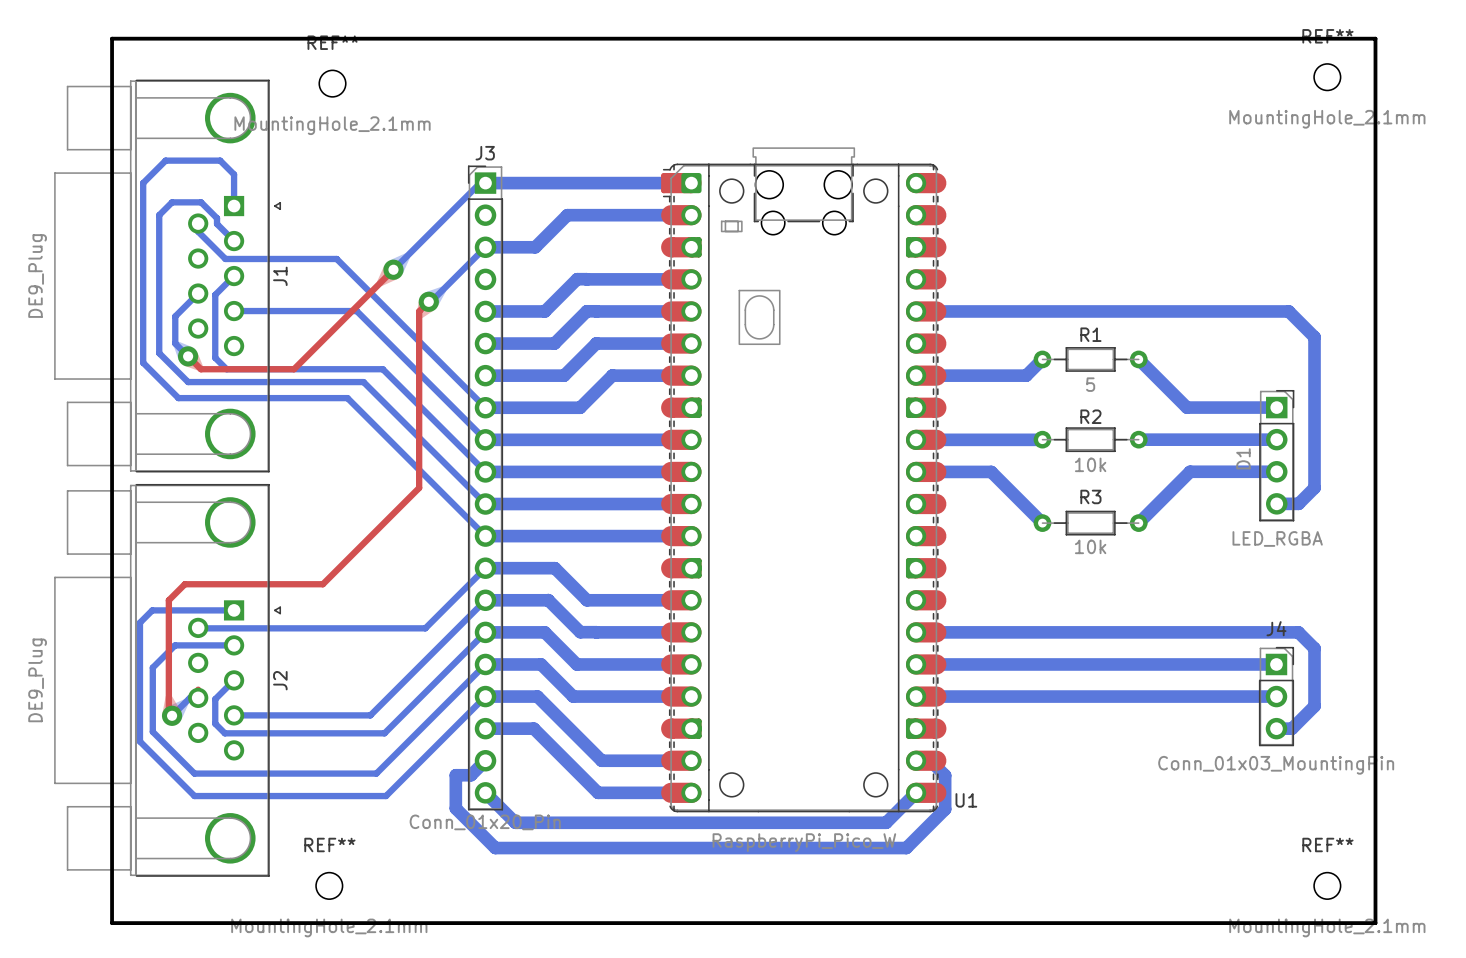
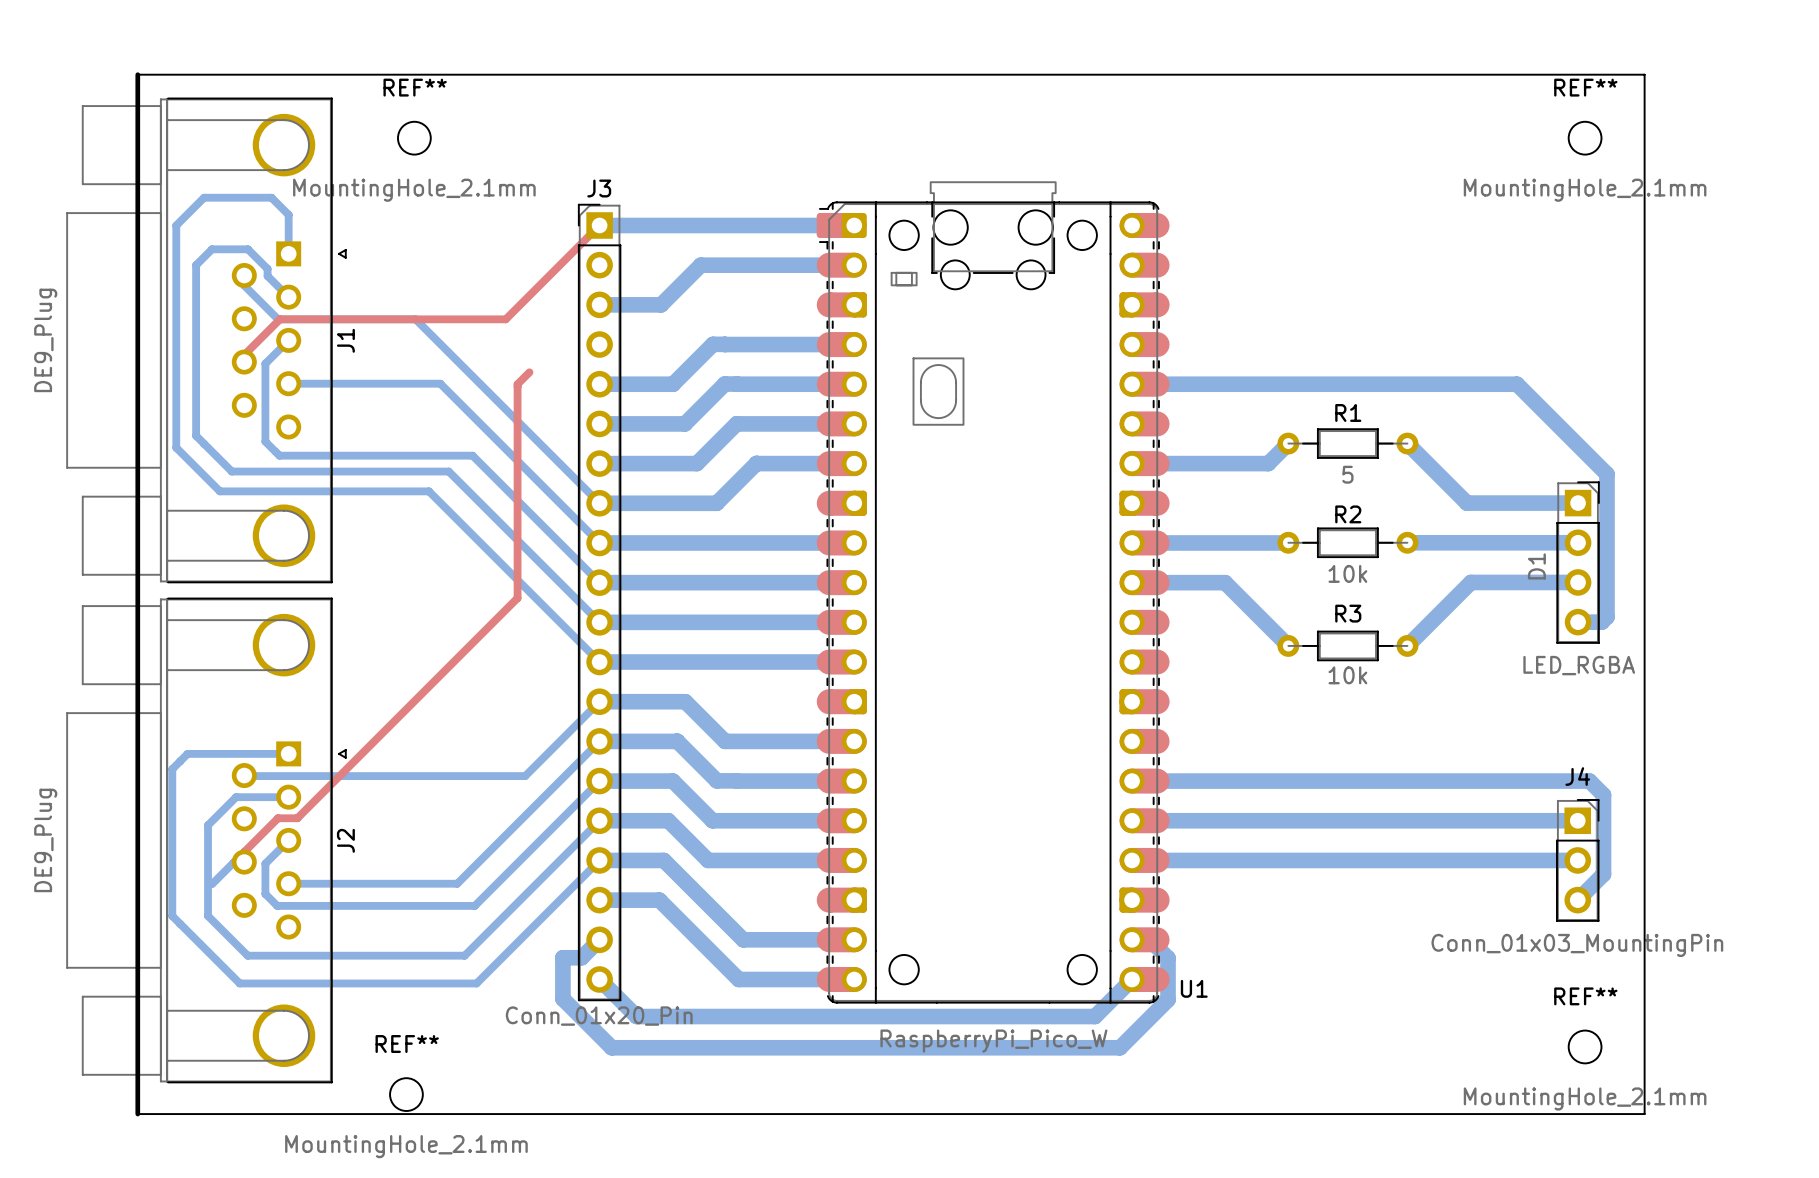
board edge: (112, 61) (112, 38) (1375, 38) (1375, 923) (112, 923) (112, 901) -> (137, 74) (1644, 74) (1644, 1114) (137, 1114)
REF** position: (1327, 77) -> (1585, 138)
REF** position: (332, 83) -> (414, 138)
bottom track: (485, 183) (480, 183) (393, 269) -> none
top track: none -> (599, 225) (505, 319) (279, 319) (244, 354)
bottom track: (483, 247) (485, 247) (430, 301) (428, 301) -> none
top track: (393, 269) (294, 369) (200, 369) (188, 356) -> none
via: (393, 269) -> none
bottom track: (198, 293) (175, 316) (175, 343) (188, 356) -> none
via: (428, 301) -> none
bottom track: (1227, 311) (1288, 311) (1314, 337) (1314, 487) (1298, 503) (1296, 503) -> (1517, 384) (1606, 474) (1606, 617) (1601, 622)
via: (188, 356) -> none
top track: (419, 484) (419, 487) (322, 584) (184, 584) (168, 600) (168, 712) (172, 715) -> (517, 598) (297, 818) (277, 818) (244, 851)
bottom track: (1286, 632) (1298, 632) (1314, 648) (1314, 706) (1292, 728) (1276, 728) -> (1589, 781) (1603, 794) (1603, 874) (1577, 900)
bottom track: (191, 645) (175, 645) (152, 667) (152, 731) (194, 773) (200, 773) -> (236, 797) (208, 825) (208, 916) (247, 955)
via: (172, 715) -> none
REF** position: (1327, 885) -> (1585, 1046)

